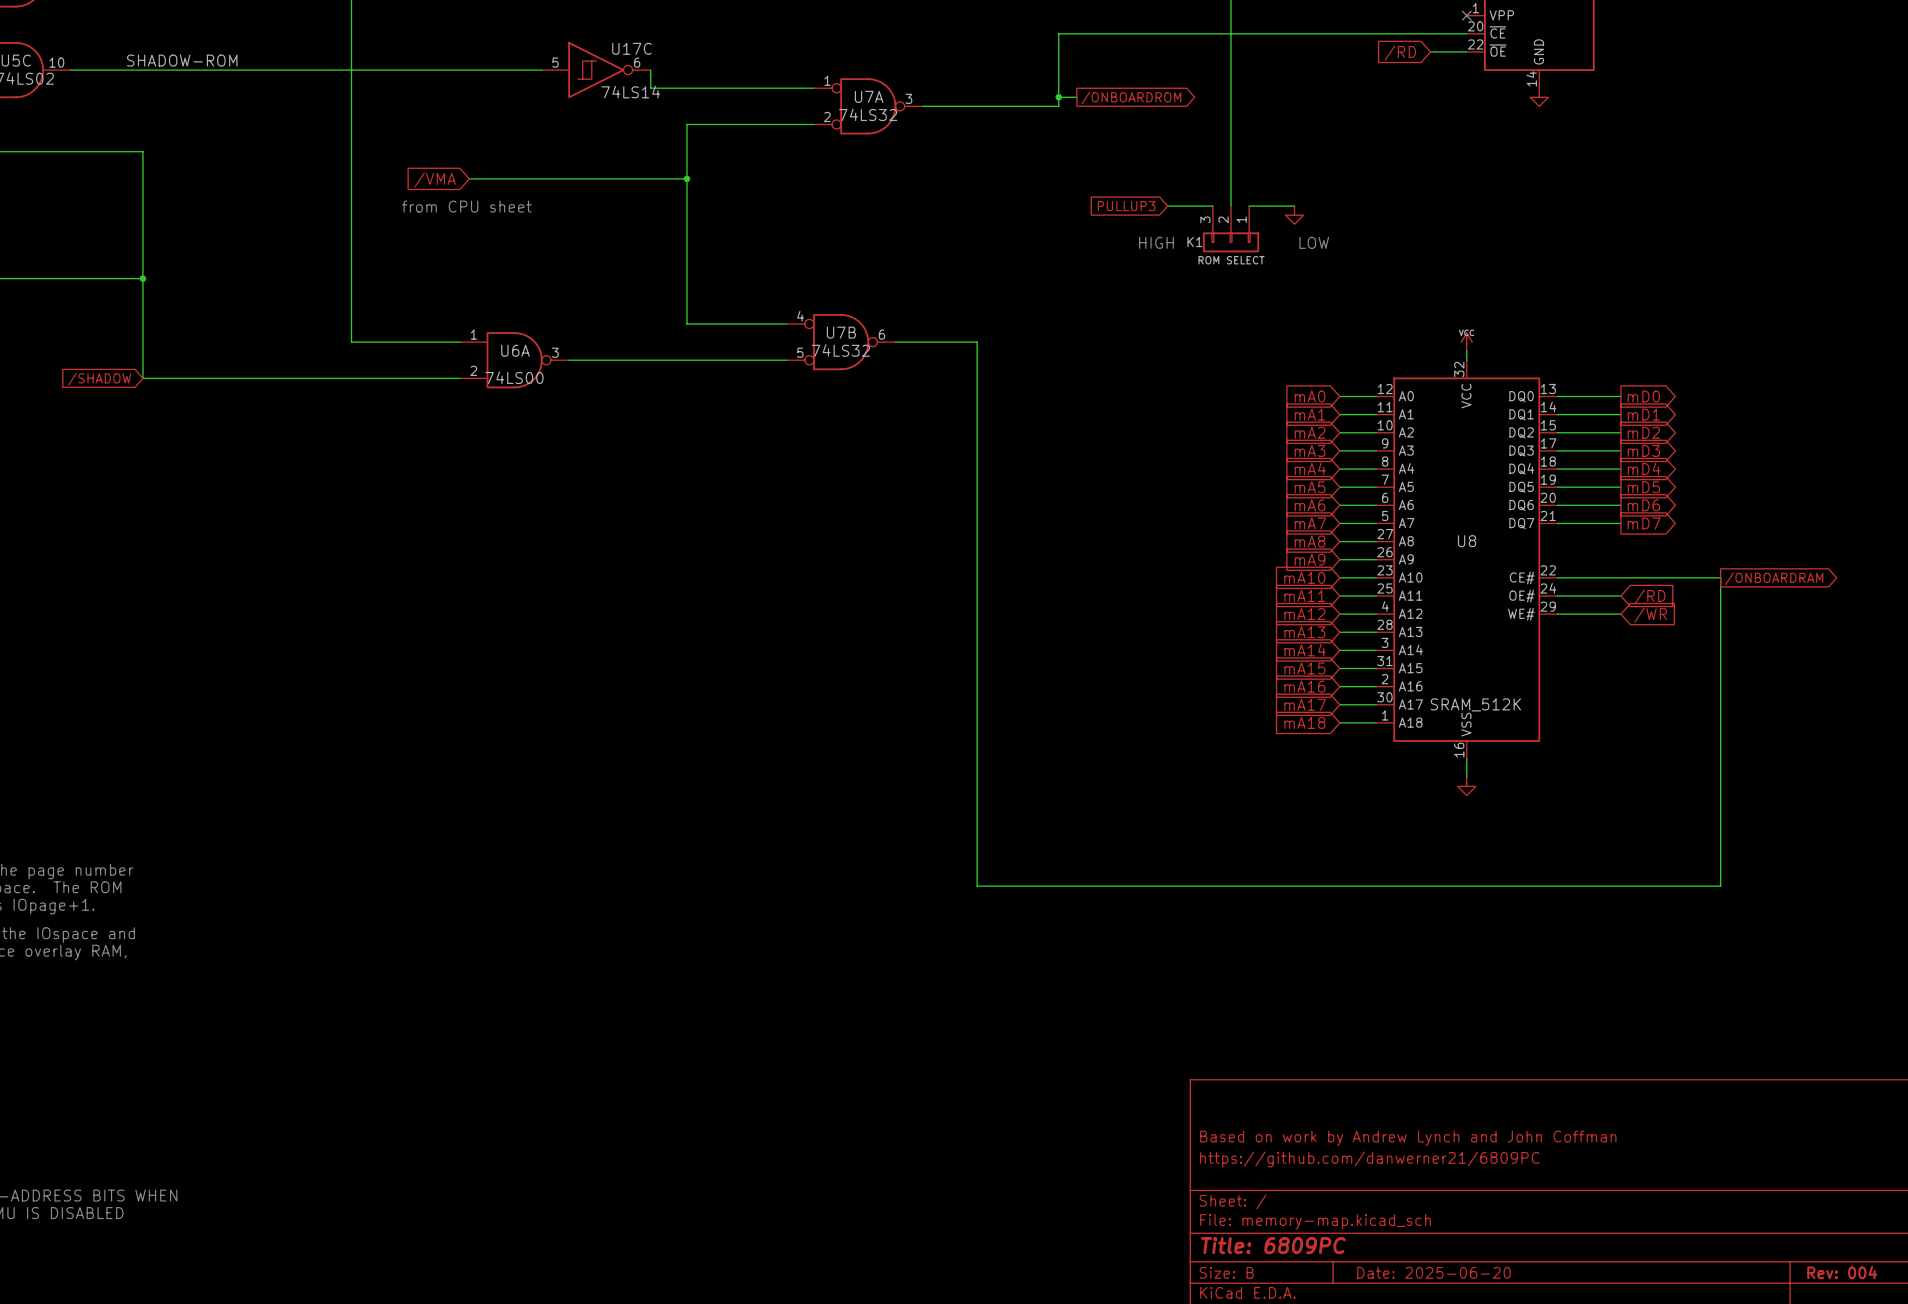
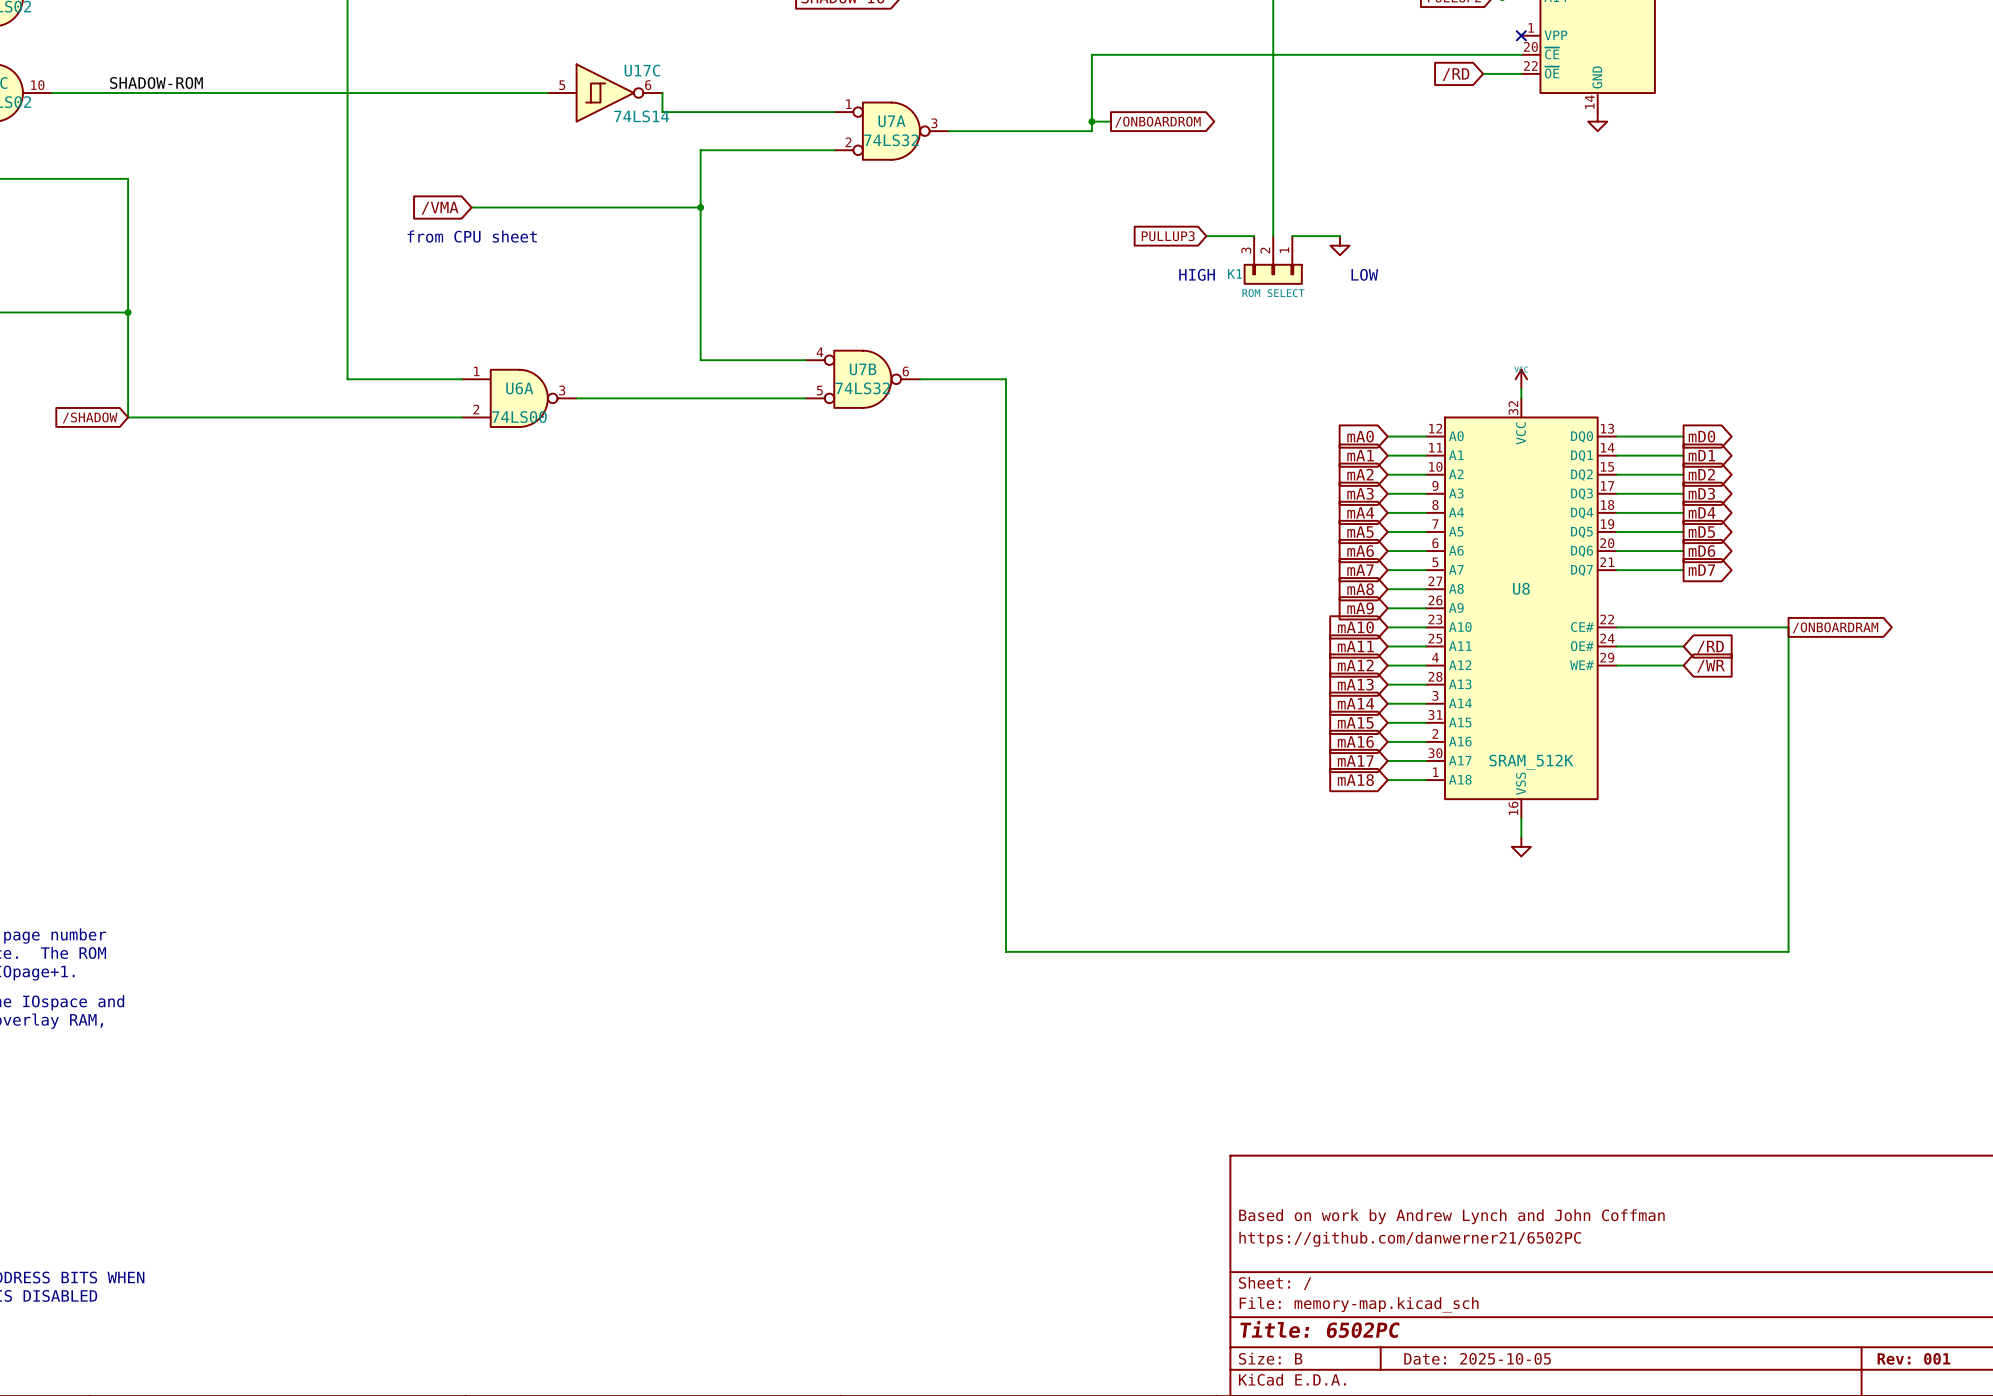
title block: https://github.com/danwerner21/6809PC (1369, 1159) -> https://github.com/danwerner21/6502PC (1410, 1239)
title block: Title: 6809PC (1273, 1245) -> Title: 6502PC (1319, 1329)
title block: Date: 2025-06-20 (1434, 1272) -> Date: 2025-10-05 (1477, 1358)
title block: Rev: 004 (1842, 1272) -> Rev: 001 (1913, 1358)

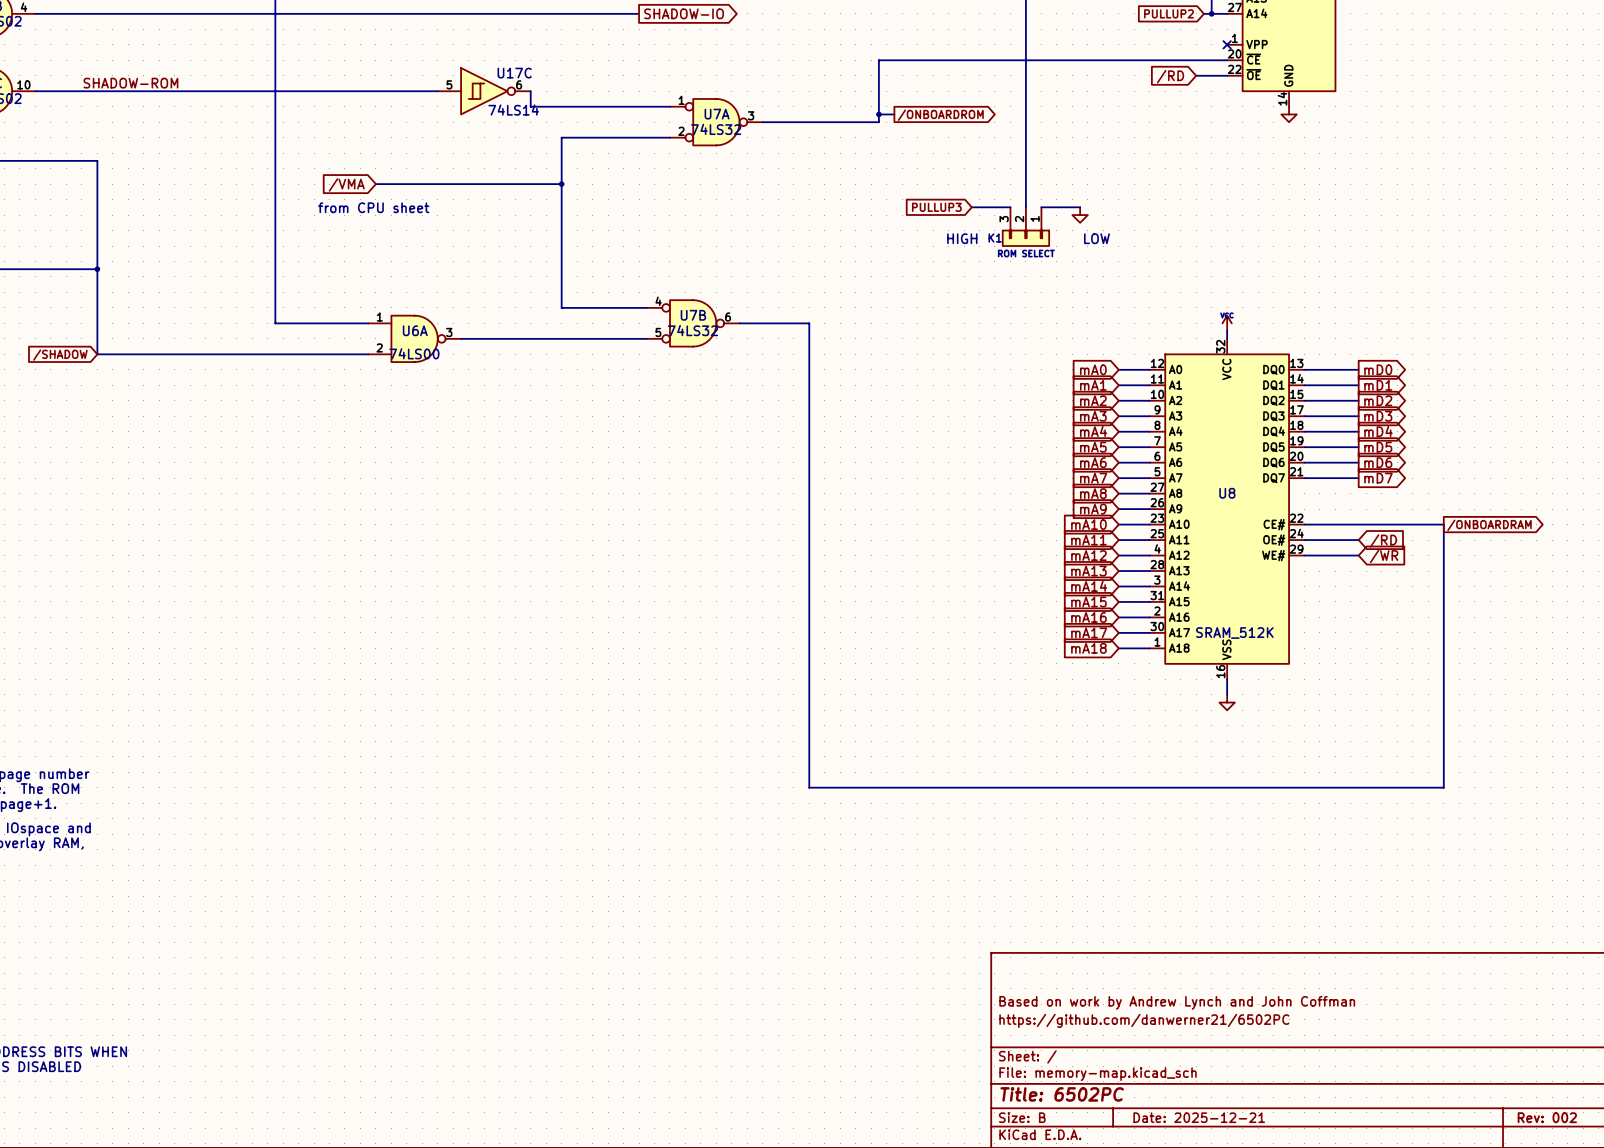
title block: Date: 2025-10-05 (1477, 1358) -> Date: 2025-12-21 (1199, 1117)
title block: Rev: 001 (1913, 1358) -> Rev: 002 (1547, 1117)

